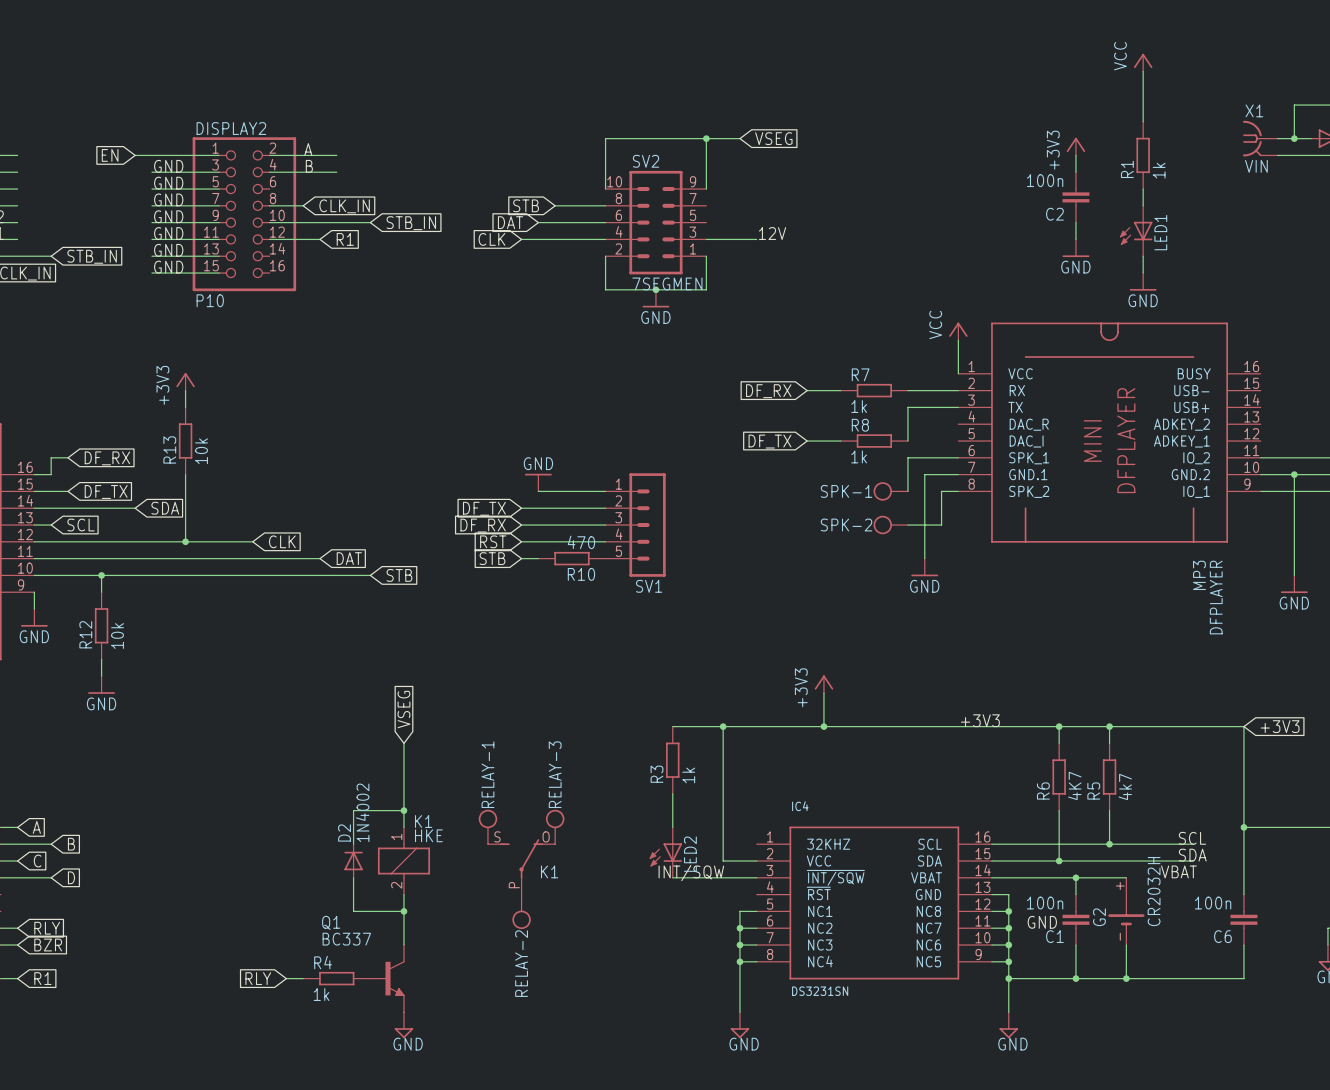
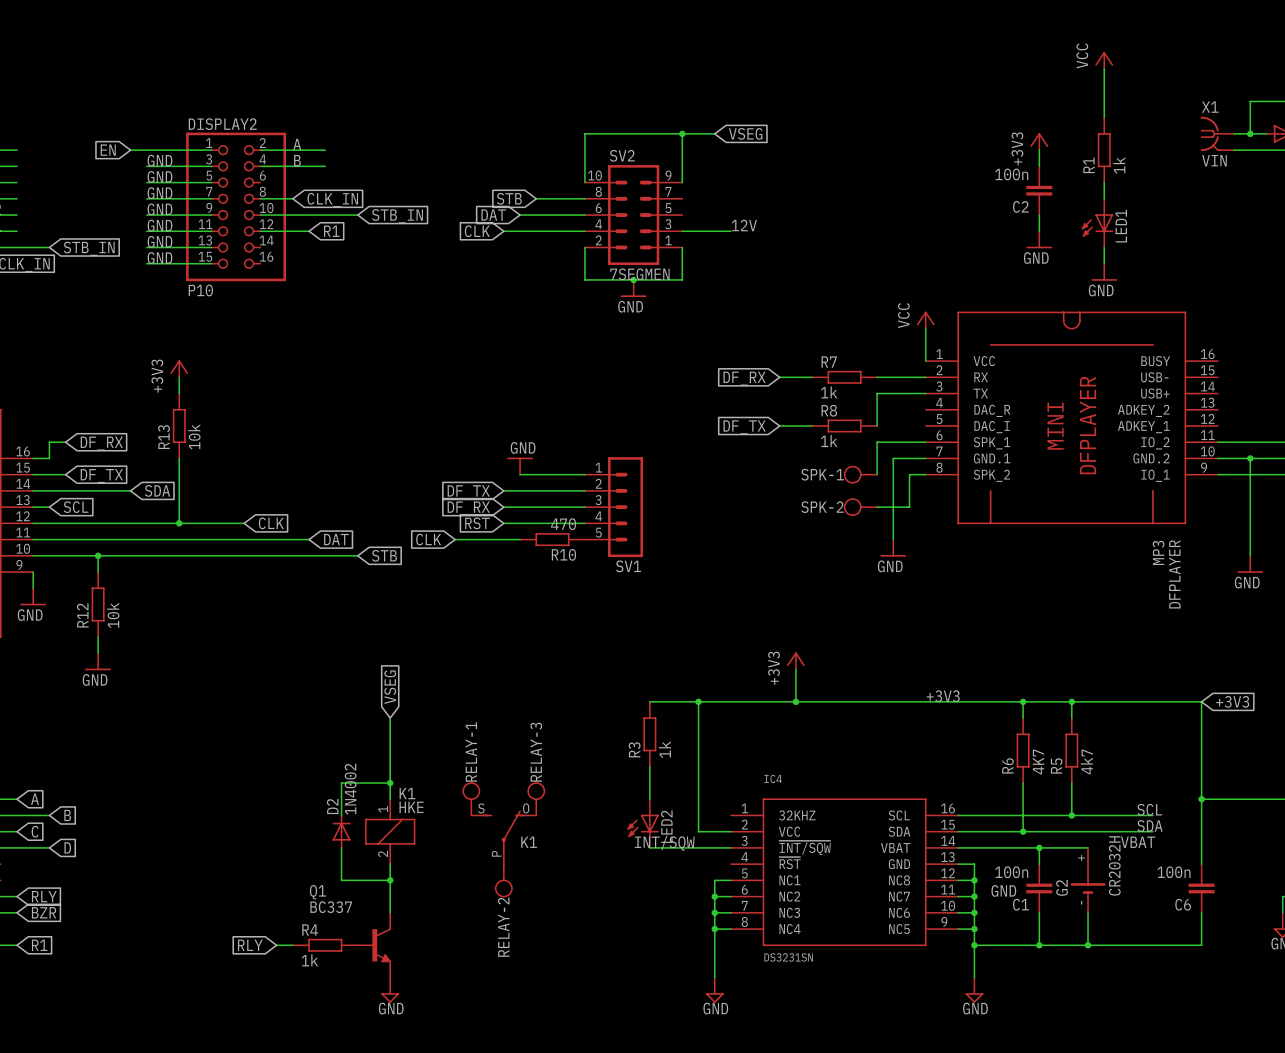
global label: none -> CLK (428, 539)
wire: none -> (455, 539) (503, 539)
global label: STB (492, 558) -> none

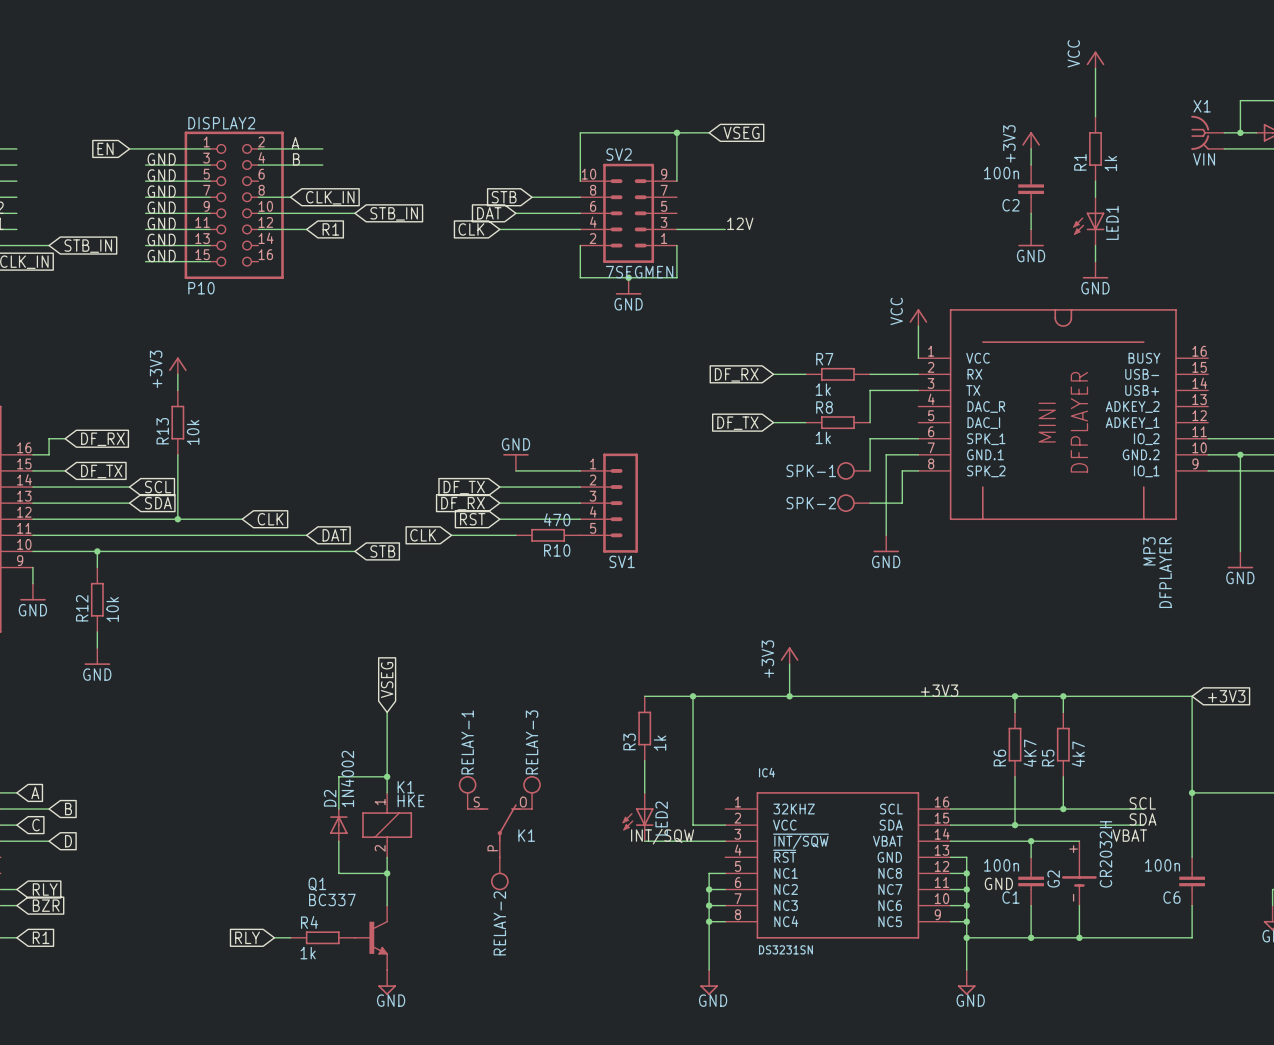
global label: SDA (157, 490) -> SCL (158, 487)
wire: none -> (49, 503) (129, 503)
global label: SCL (76, 507) -> none
global label: none -> SDA (158, 503)

